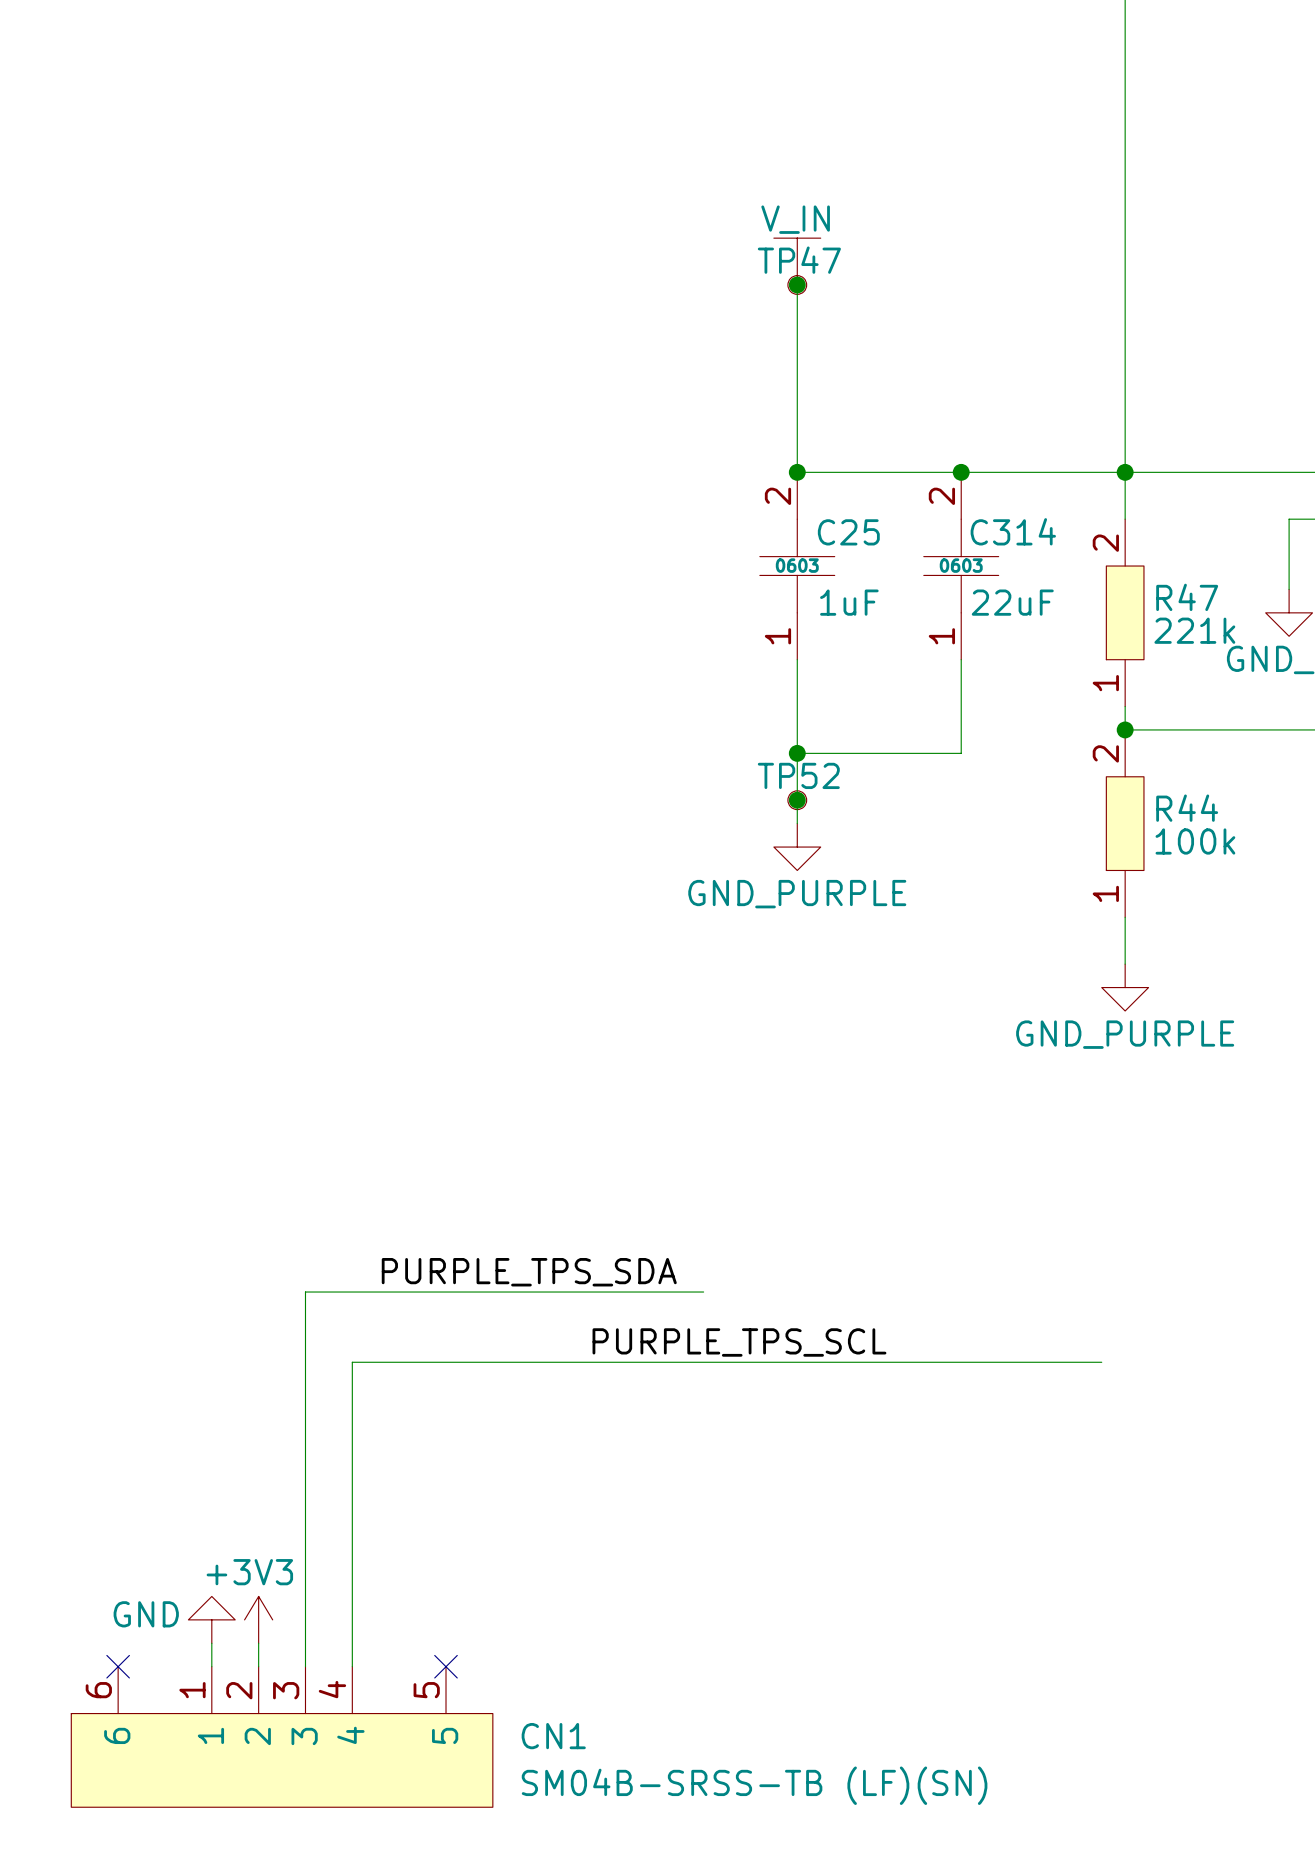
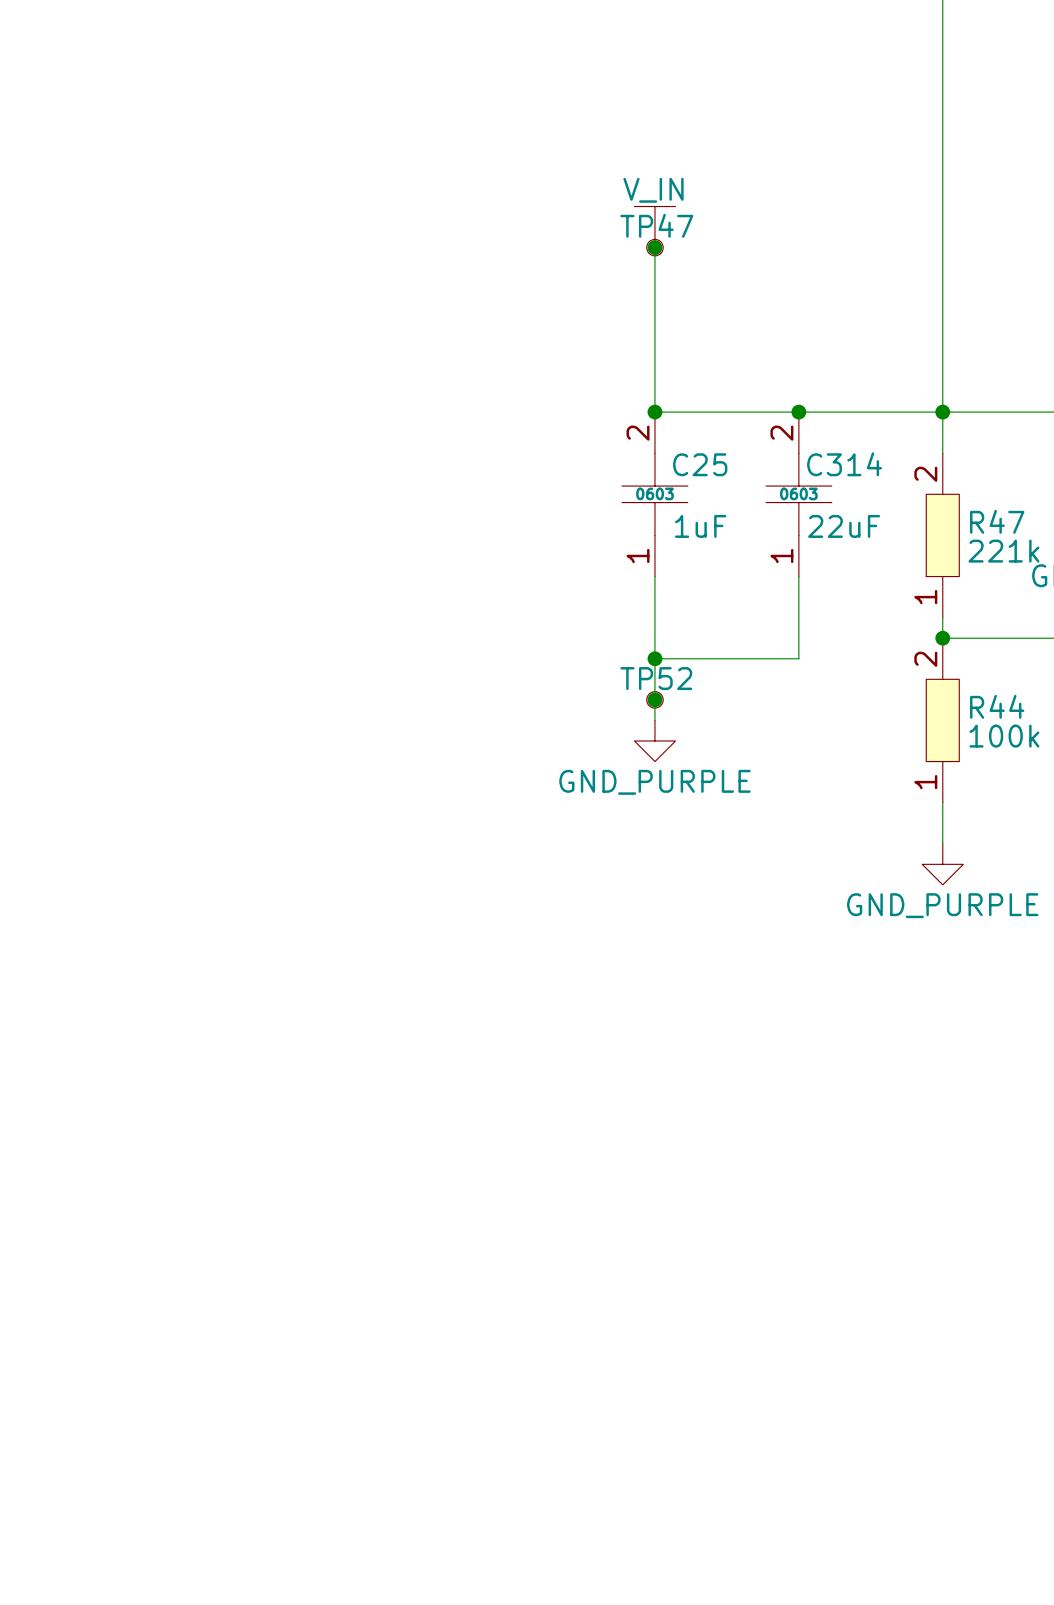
label: PURPLE_TPS_SDA (529, 1272) -> none
wire: (703, 1292) (305, 1292) (305, 1666) -> none
label: PURPLE_TPS_SCL (739, 1342) -> none
wire: (1101, 1362) (352, 1362) (352, 1666) -> none
power symbol: GND (211, 1619) -> none
power symbol: +3V3 (258, 1619) -> none
wire: (211, 1643) (211, 1666) -> none
wire: (258, 1643) (258, 1666) -> none
no-connect mark: (118, 1666) -> none
no-connect mark: (446, 1666) -> none
CN1: SM04B-SRSS-TB (LF)(SN) (282, 1736) -> none

